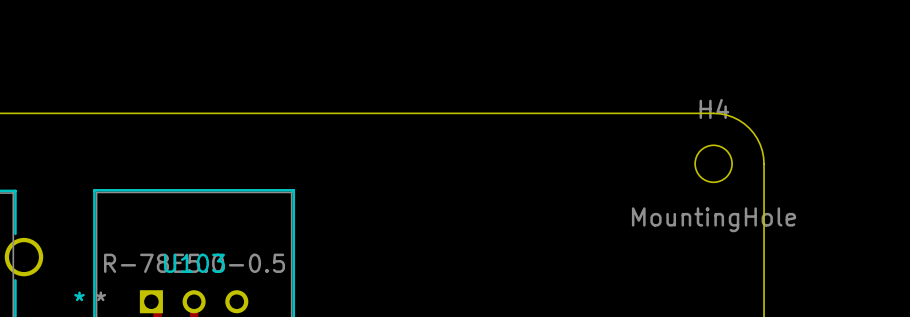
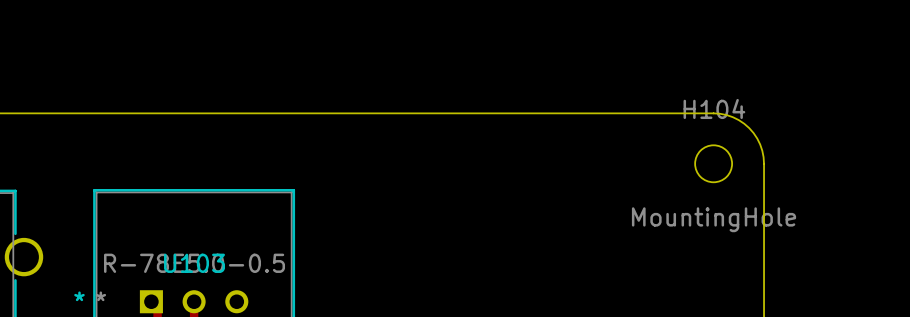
H4 name: H4 (714, 108) -> H104 (714, 108)

